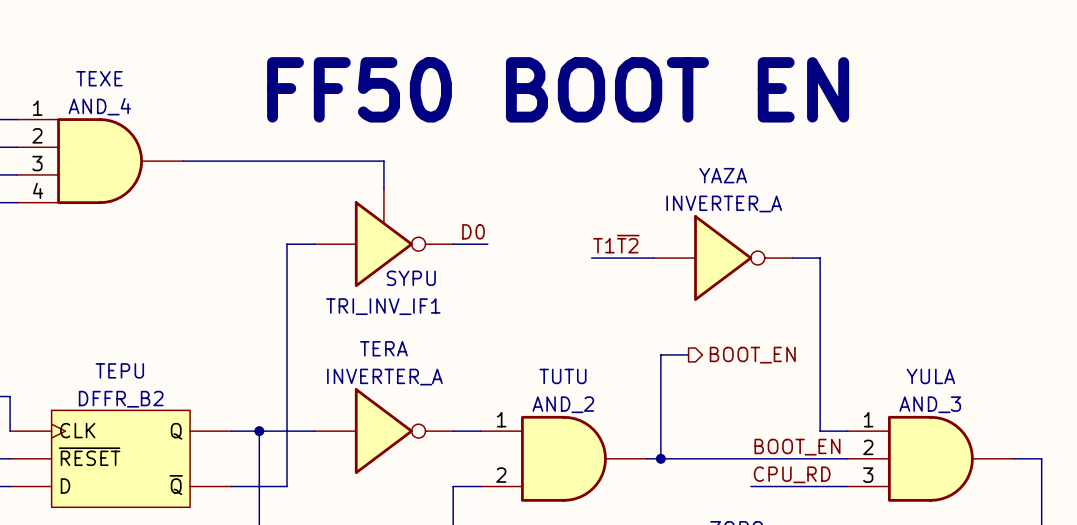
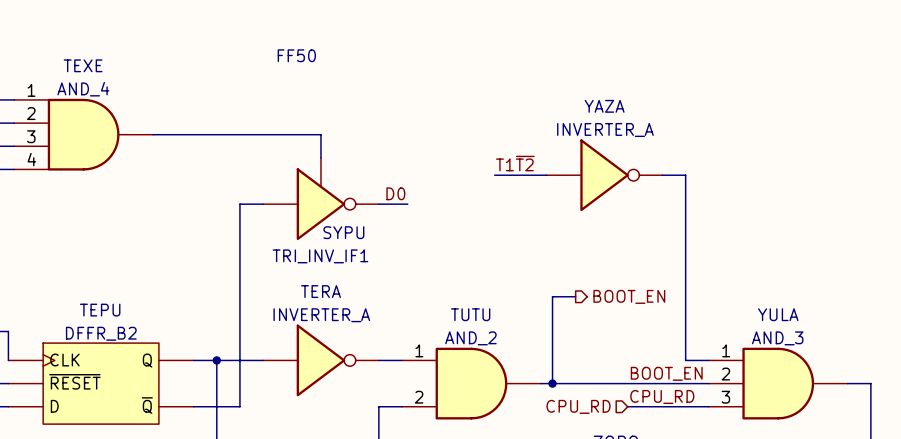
text: none -> FF50 (296, 55)
text: FF50 BOOT EN (558, 89) -> none
label position: T1~{T2} (616, 244) -> T1~{T2} (515, 163)
wire: (591, 258) (653, 258) -> (494, 175) (546, 175)
YAZA position: (723, 258) -> (604, 175)
wire: (792, 258) (820, 258) -> (662, 175) (685, 175) (685, 215)
hierarchical label: none -> CPU_RD (578, 406)

